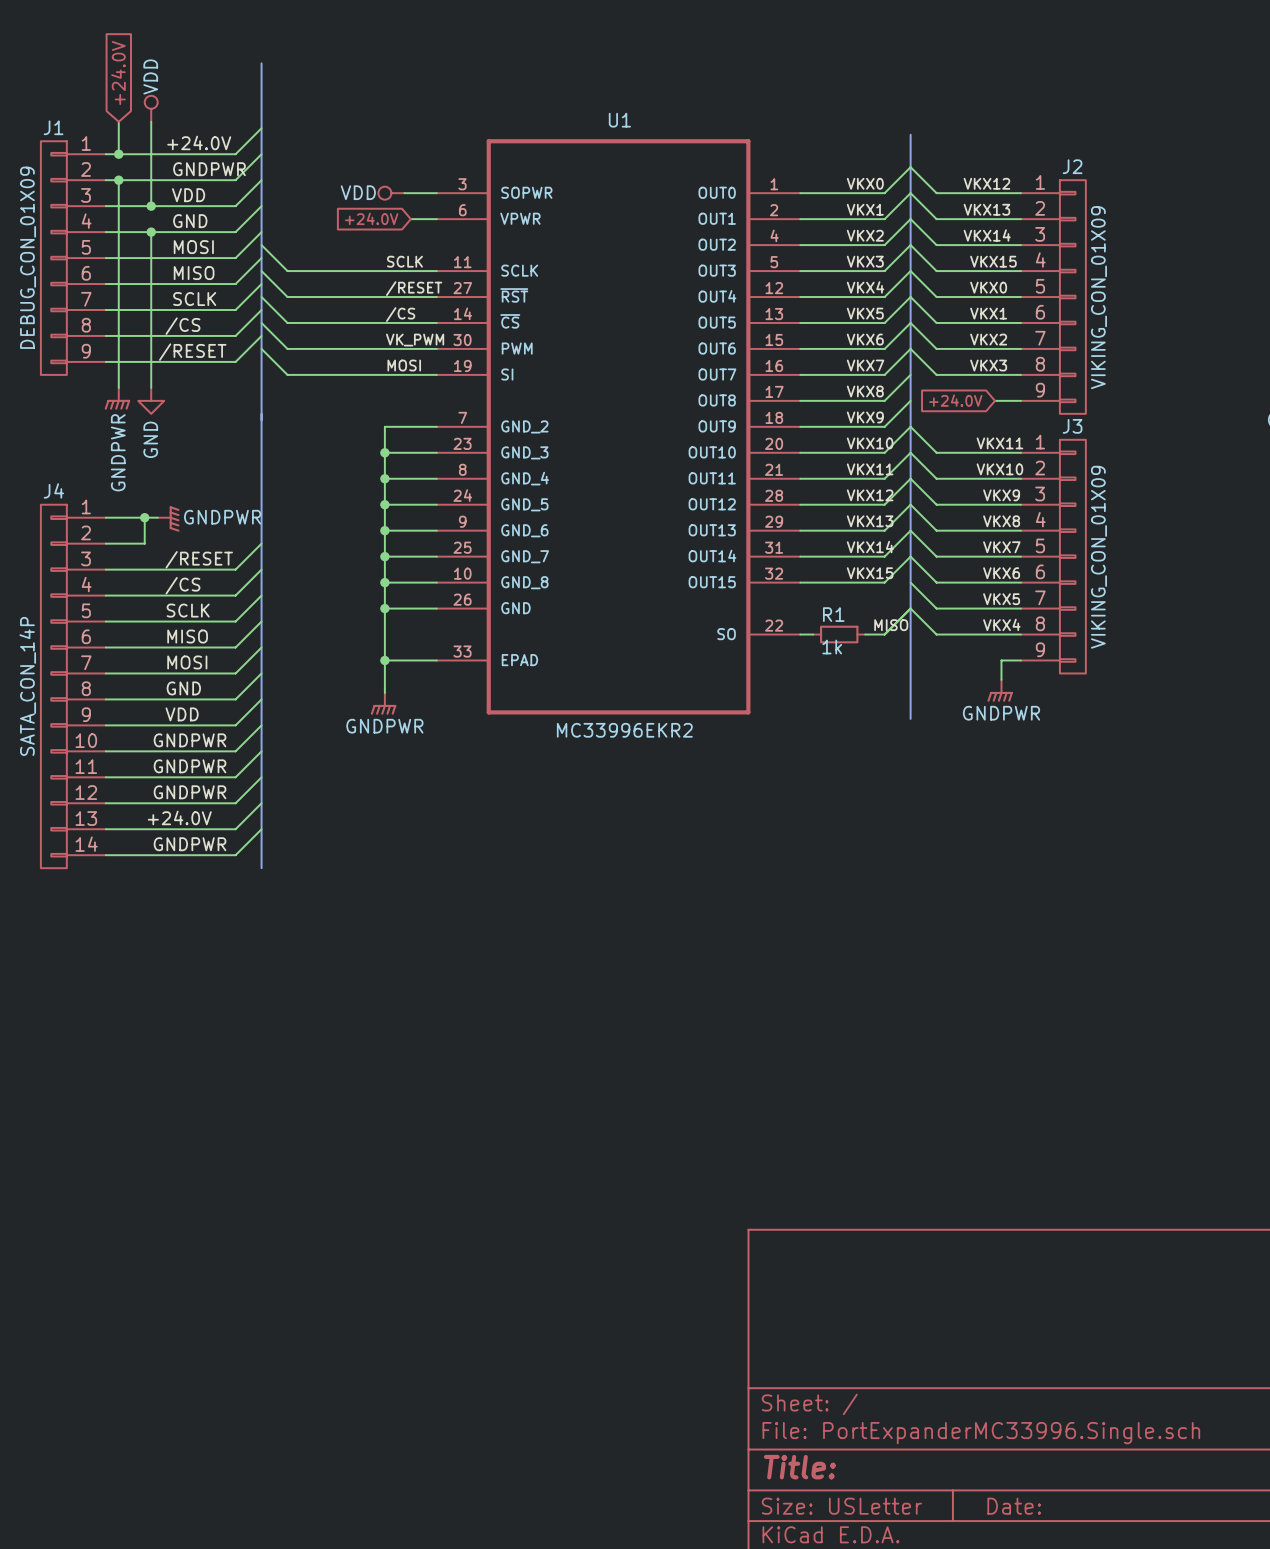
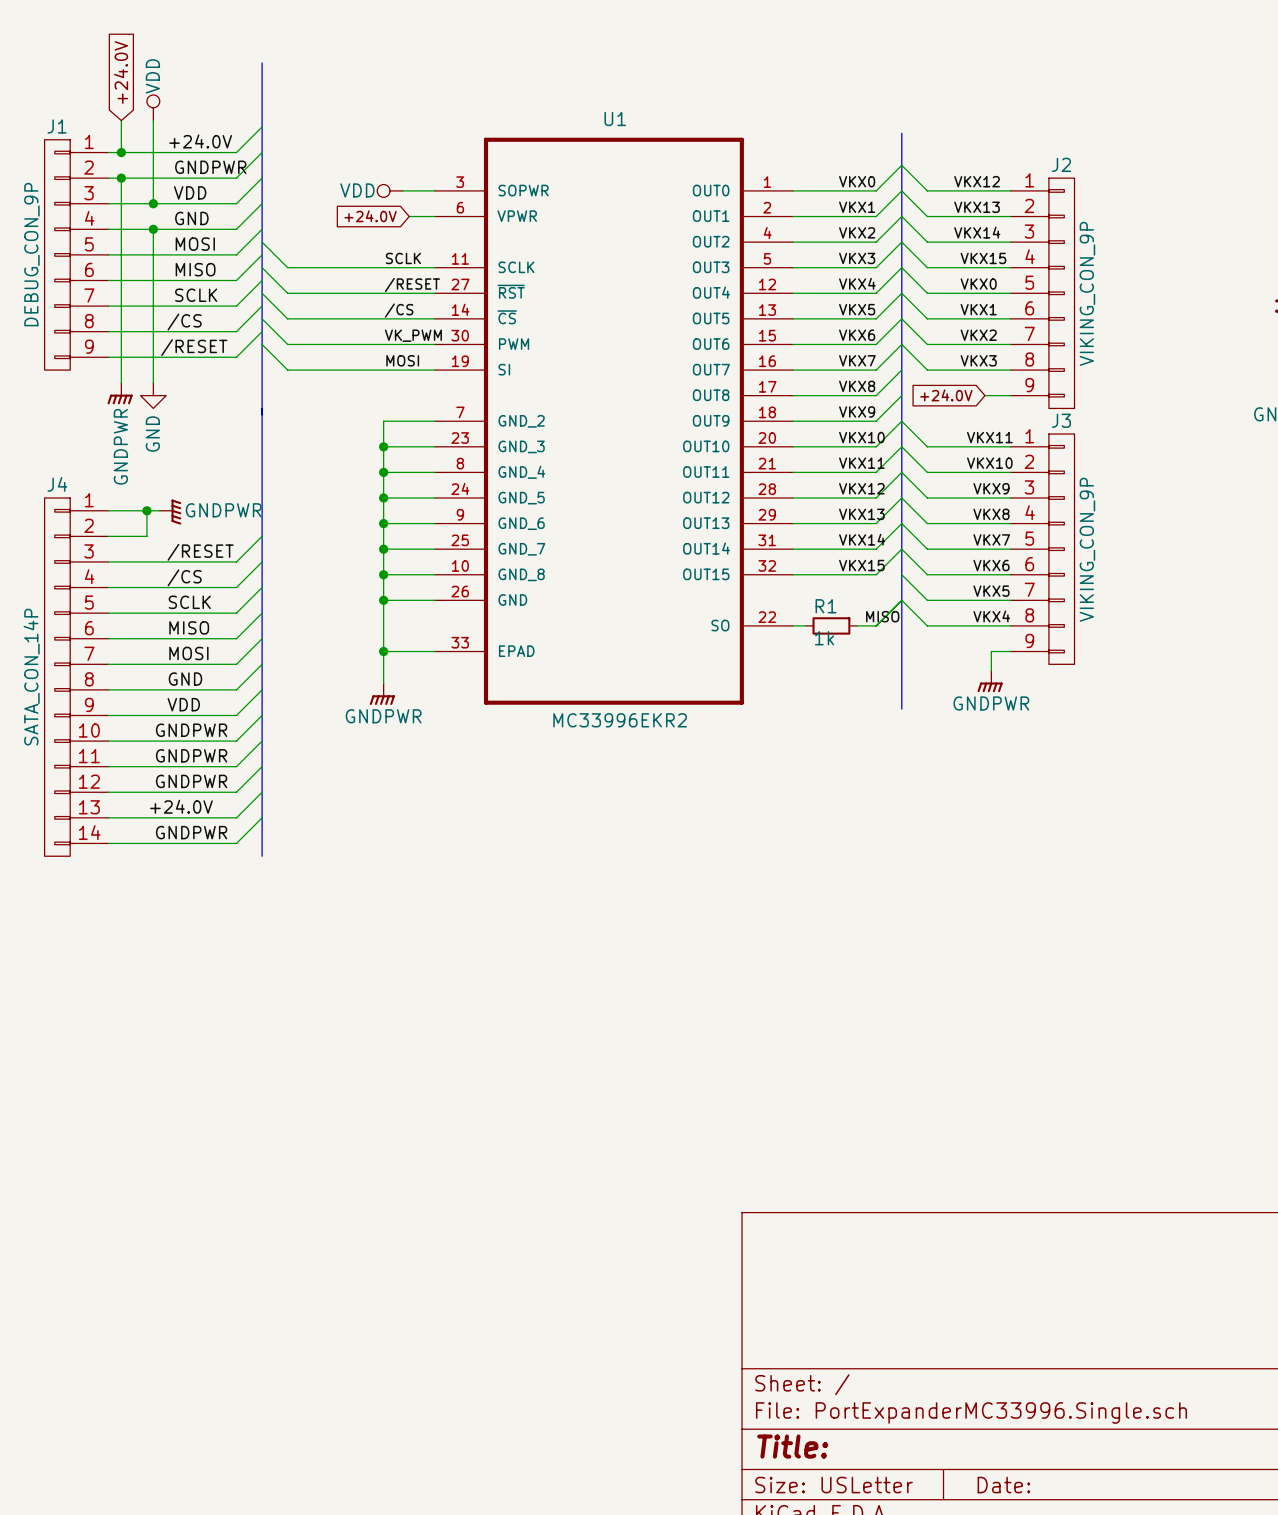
J1 value: DEBUG_CON_01X09 (28, 257) -> DEBUG_CON_9P (31, 254)
J2 value: VIKING_CON_01X09 (1098, 297) -> VIKING_CON_9P (1087, 293)
J3 value: VIKING_CON_01X09 (1098, 557) -> VIKING_CON_9P (1087, 549)

